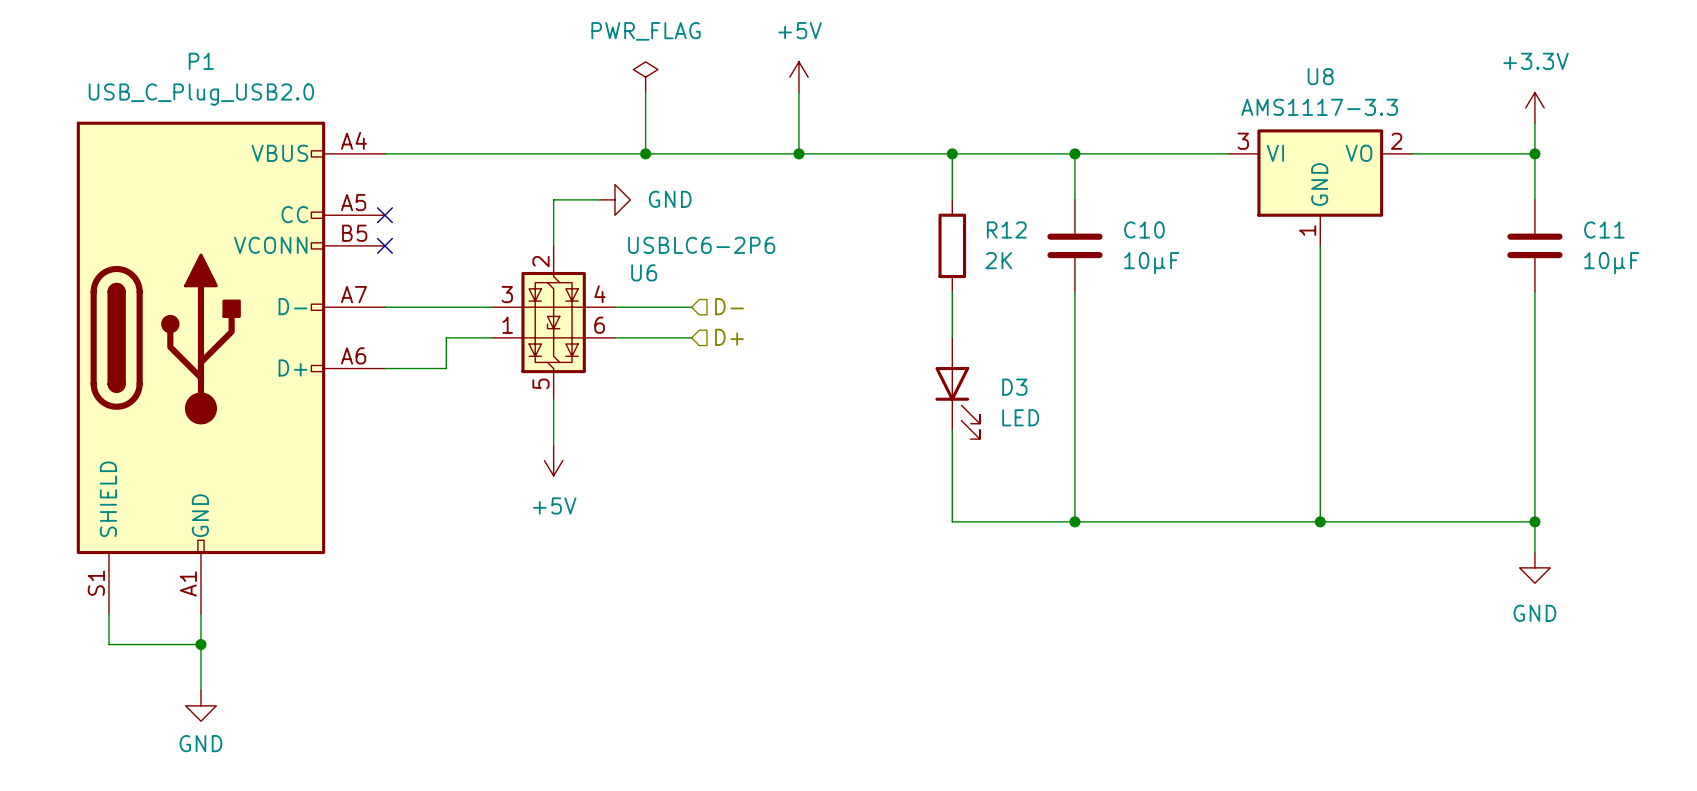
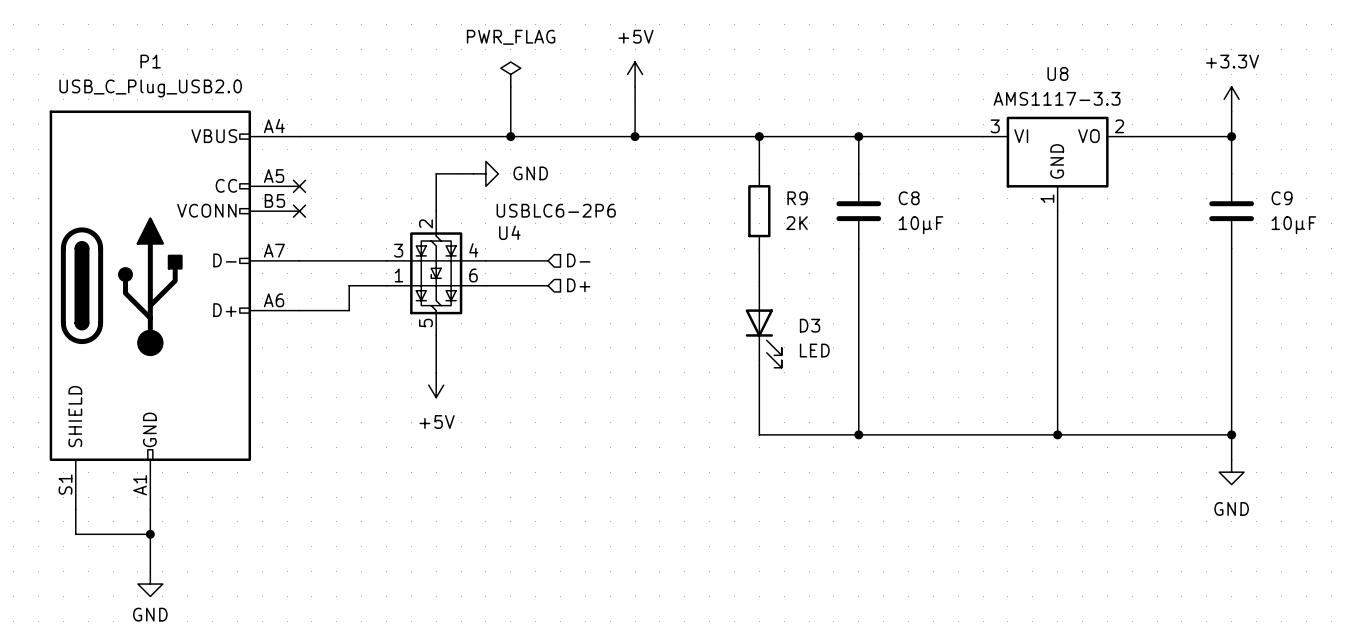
R12 name: R12 (1006, 229) -> R9 (797, 198)
C10 name: C10 (1144, 229) -> C8 (909, 198)
C11 name: C11 (1604, 229) -> C9 (1282, 198)
U6 name: U6 (644, 272) -> U4 (509, 232)

